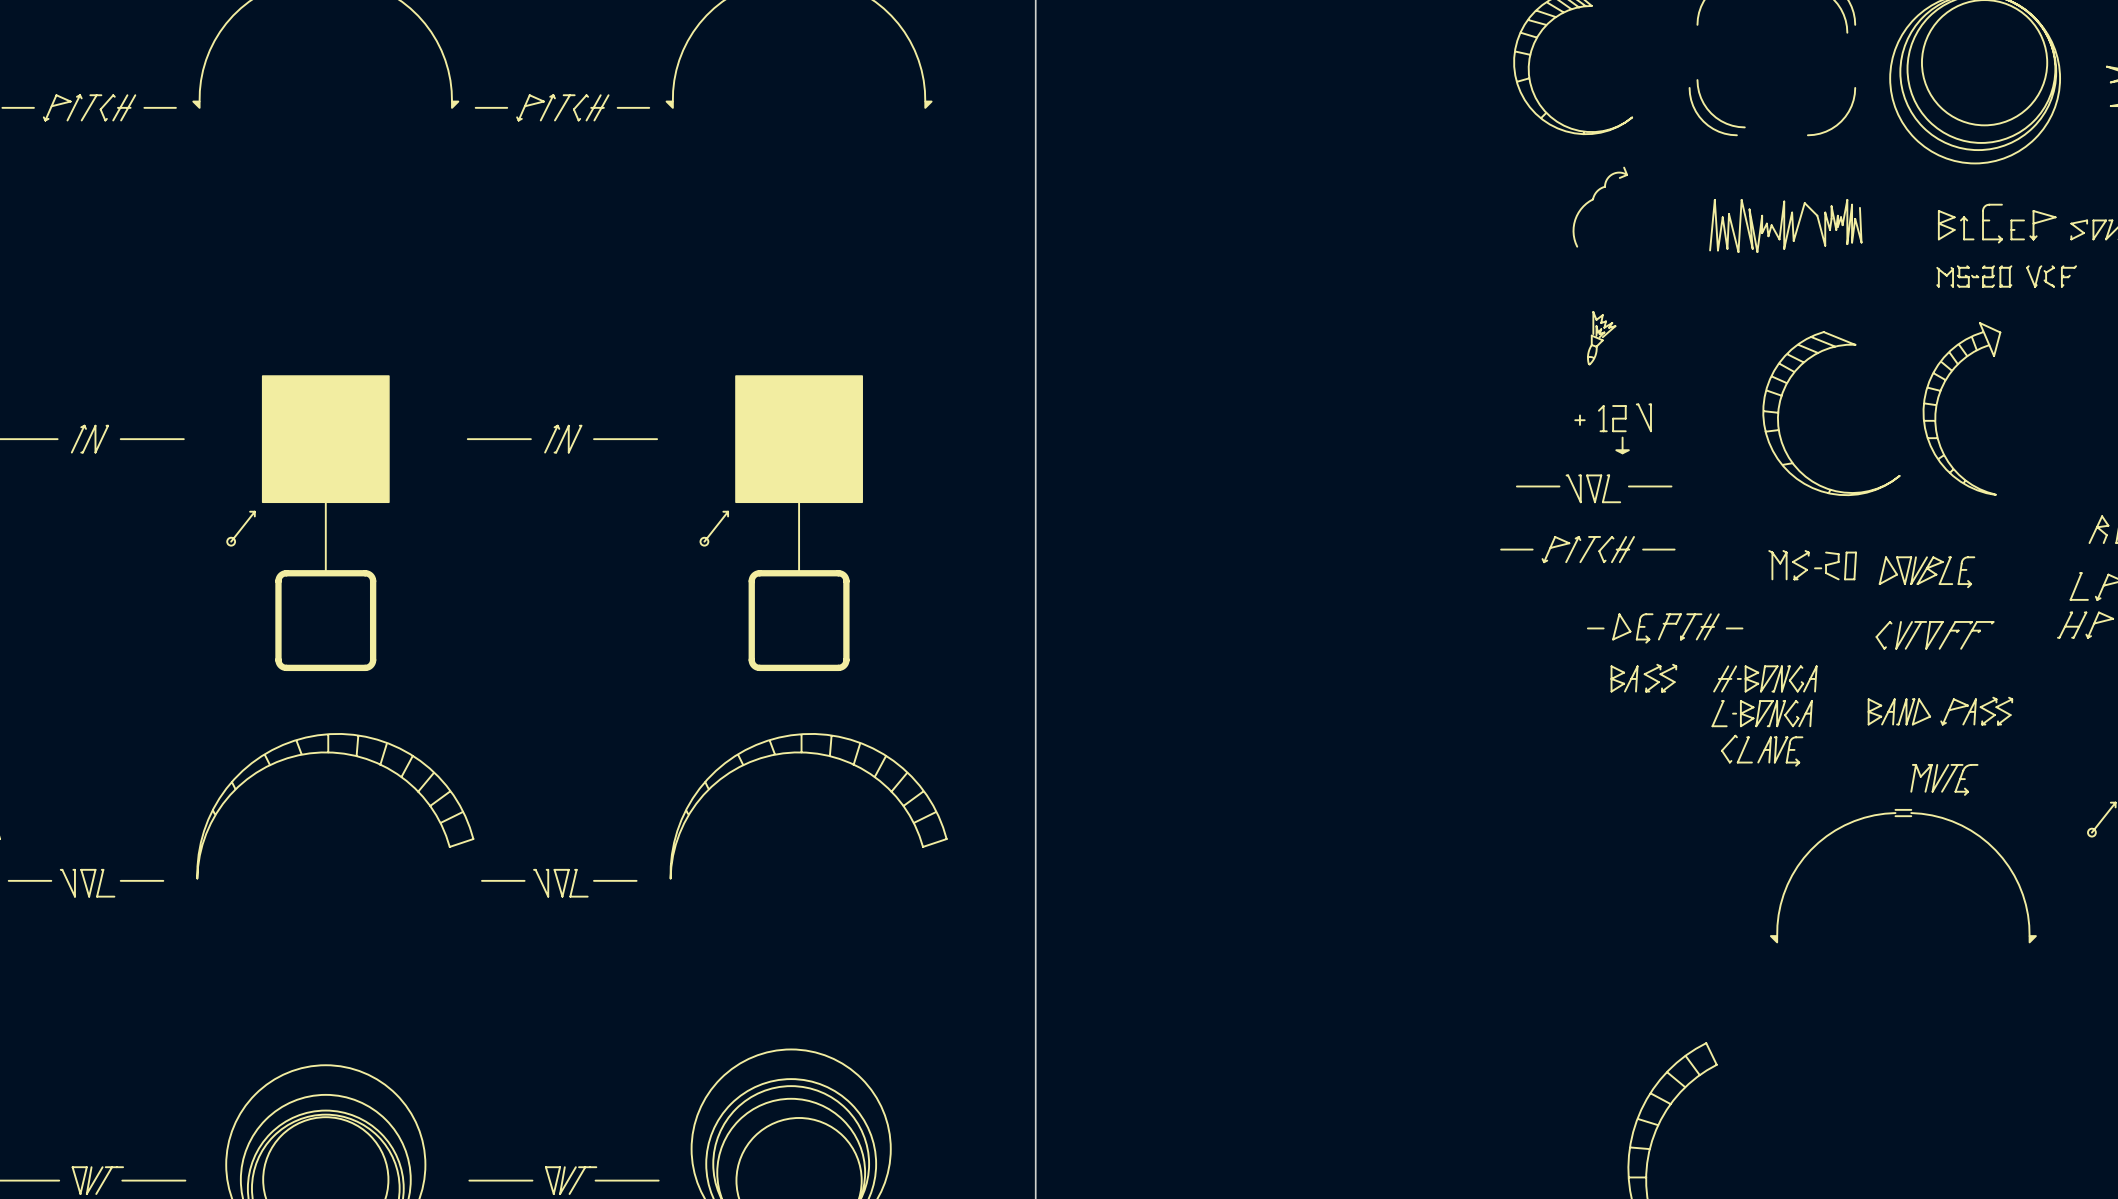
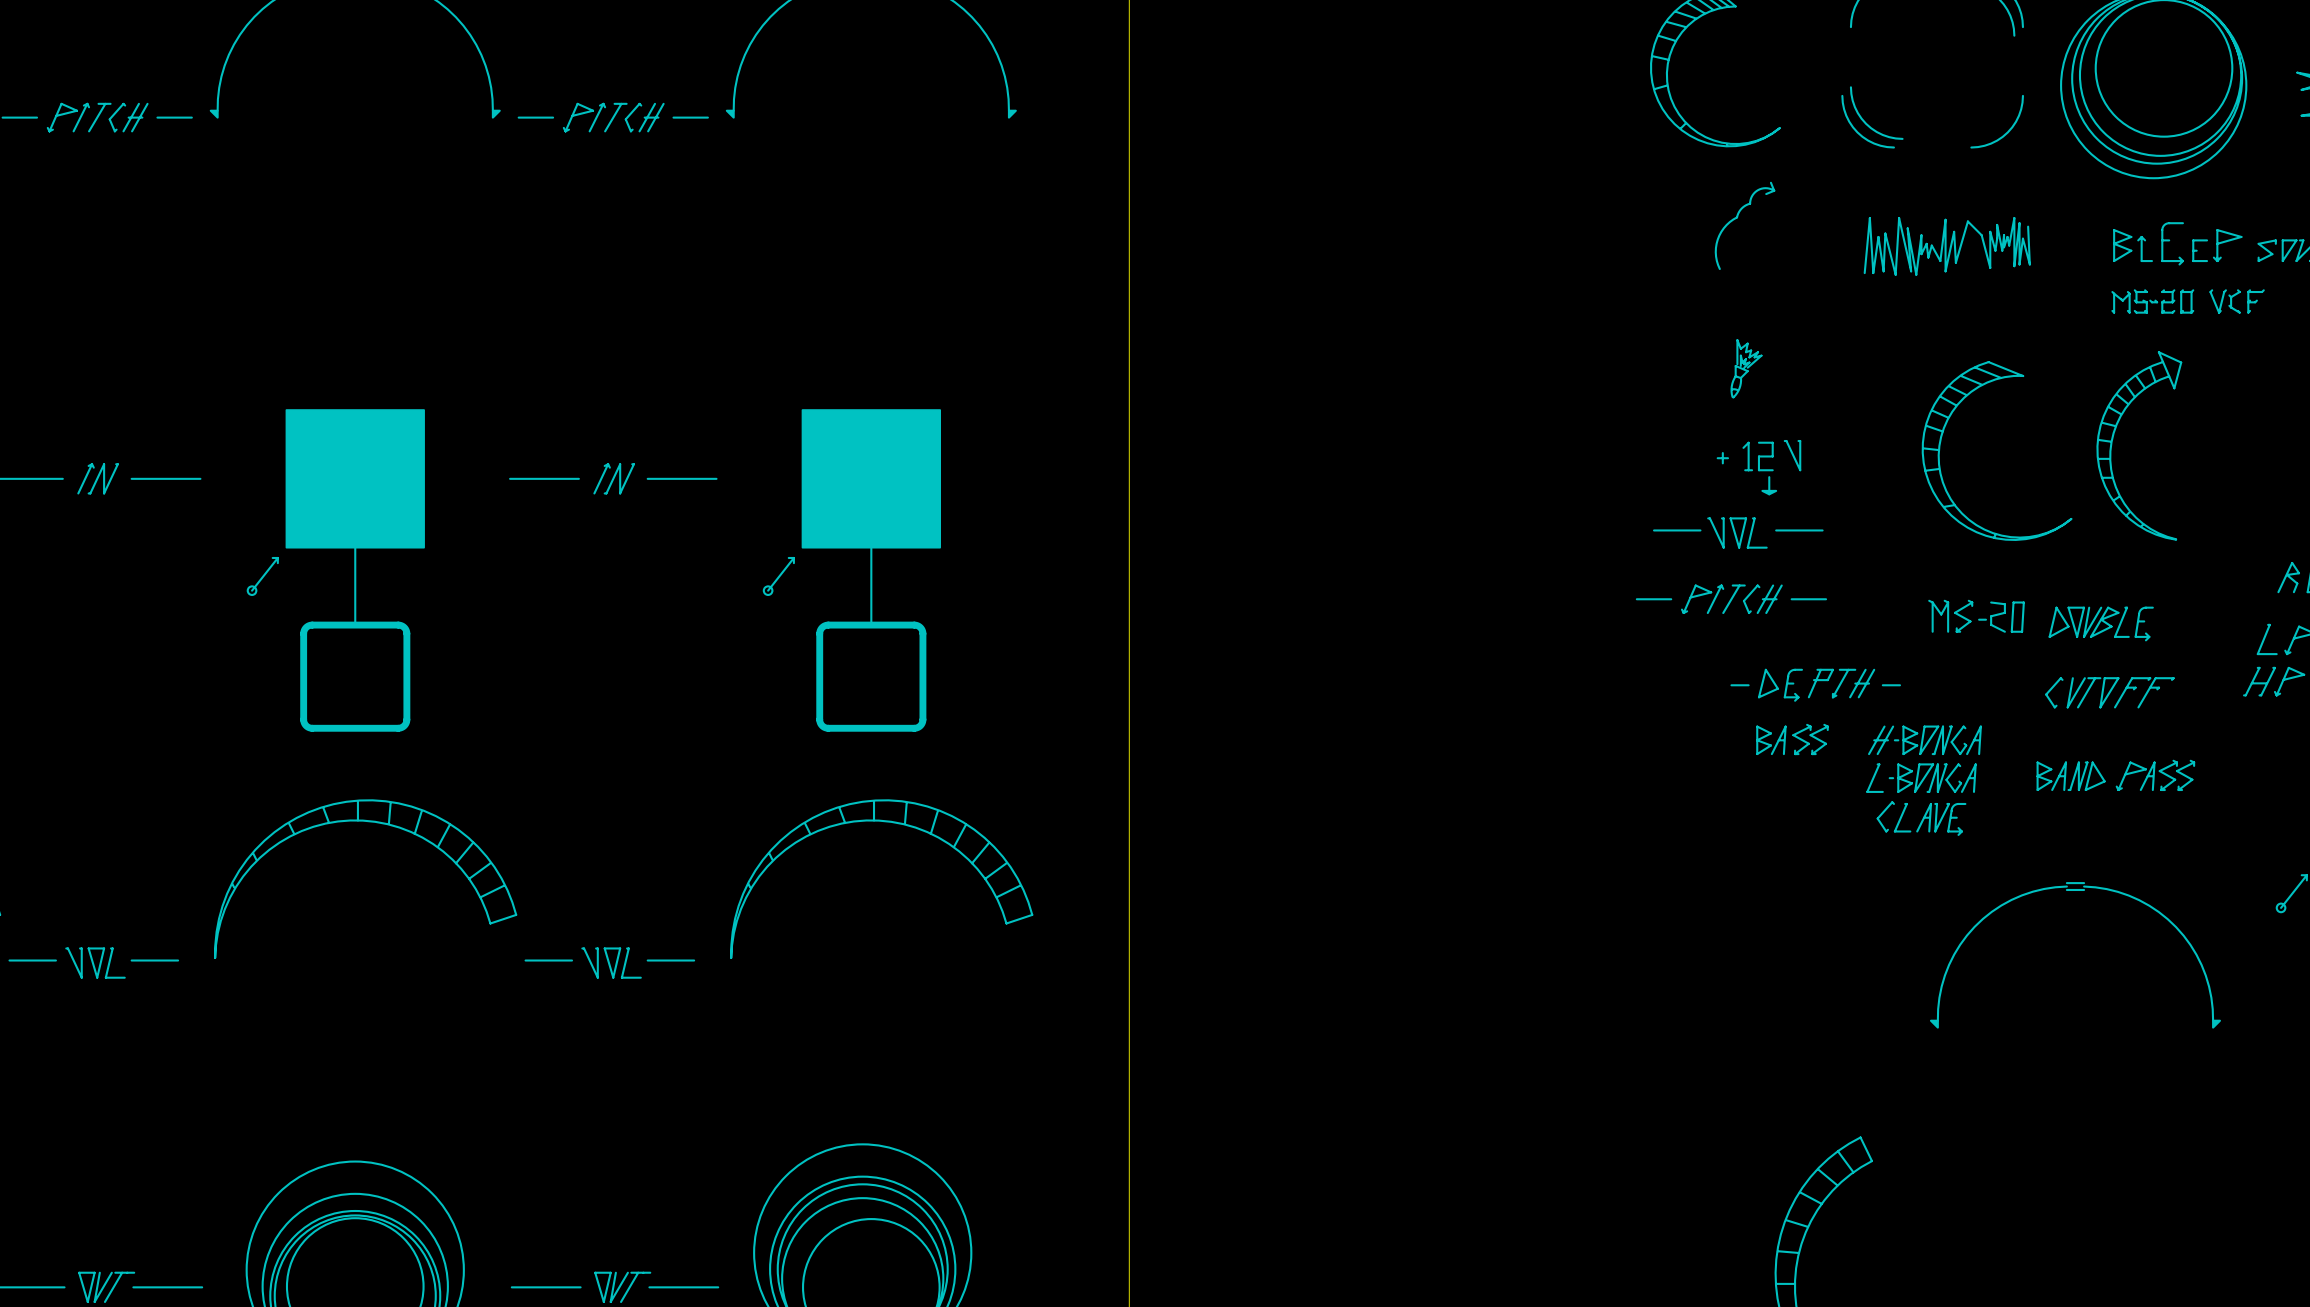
line: (1912, 764) (1916, 764) -> none
line: (1916, 764) (1920, 776) (1931, 764) -> none
line: (1916, 764) (1911, 791) -> none
line: (1928, 764) (1931, 764) -> none
line: (1931, 764) (1925, 791) -> none
line: (1937, 764) (1932, 791) (1948, 764) -> none
line: (1951, 764) (1962, 764) -> none
line: (1957, 764) (1942, 791) -> none
line: (1977, 764) (1969, 765) (1964, 767) (1955, 791) (1966, 791) -> none
line: (1960, 779) (1964, 779) -> none
line: (1964, 788) (1968, 791) (1964, 794) -> none

